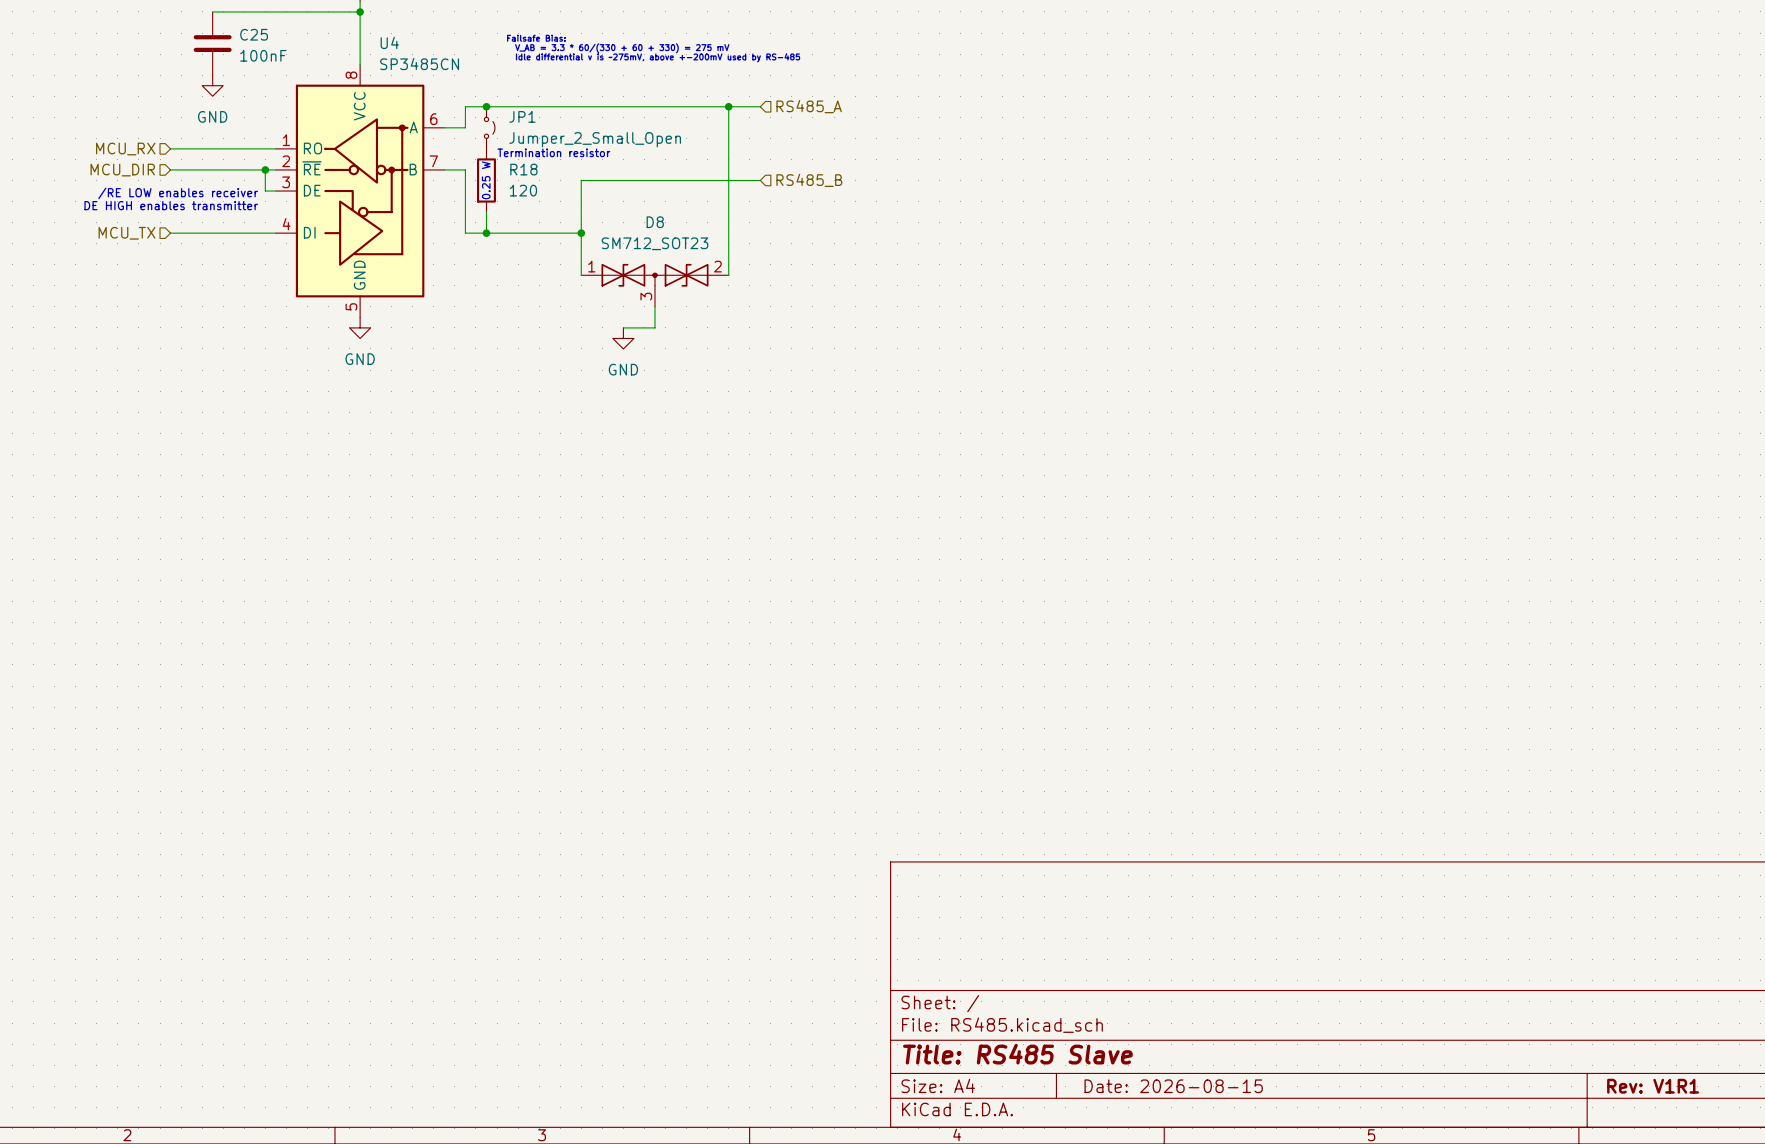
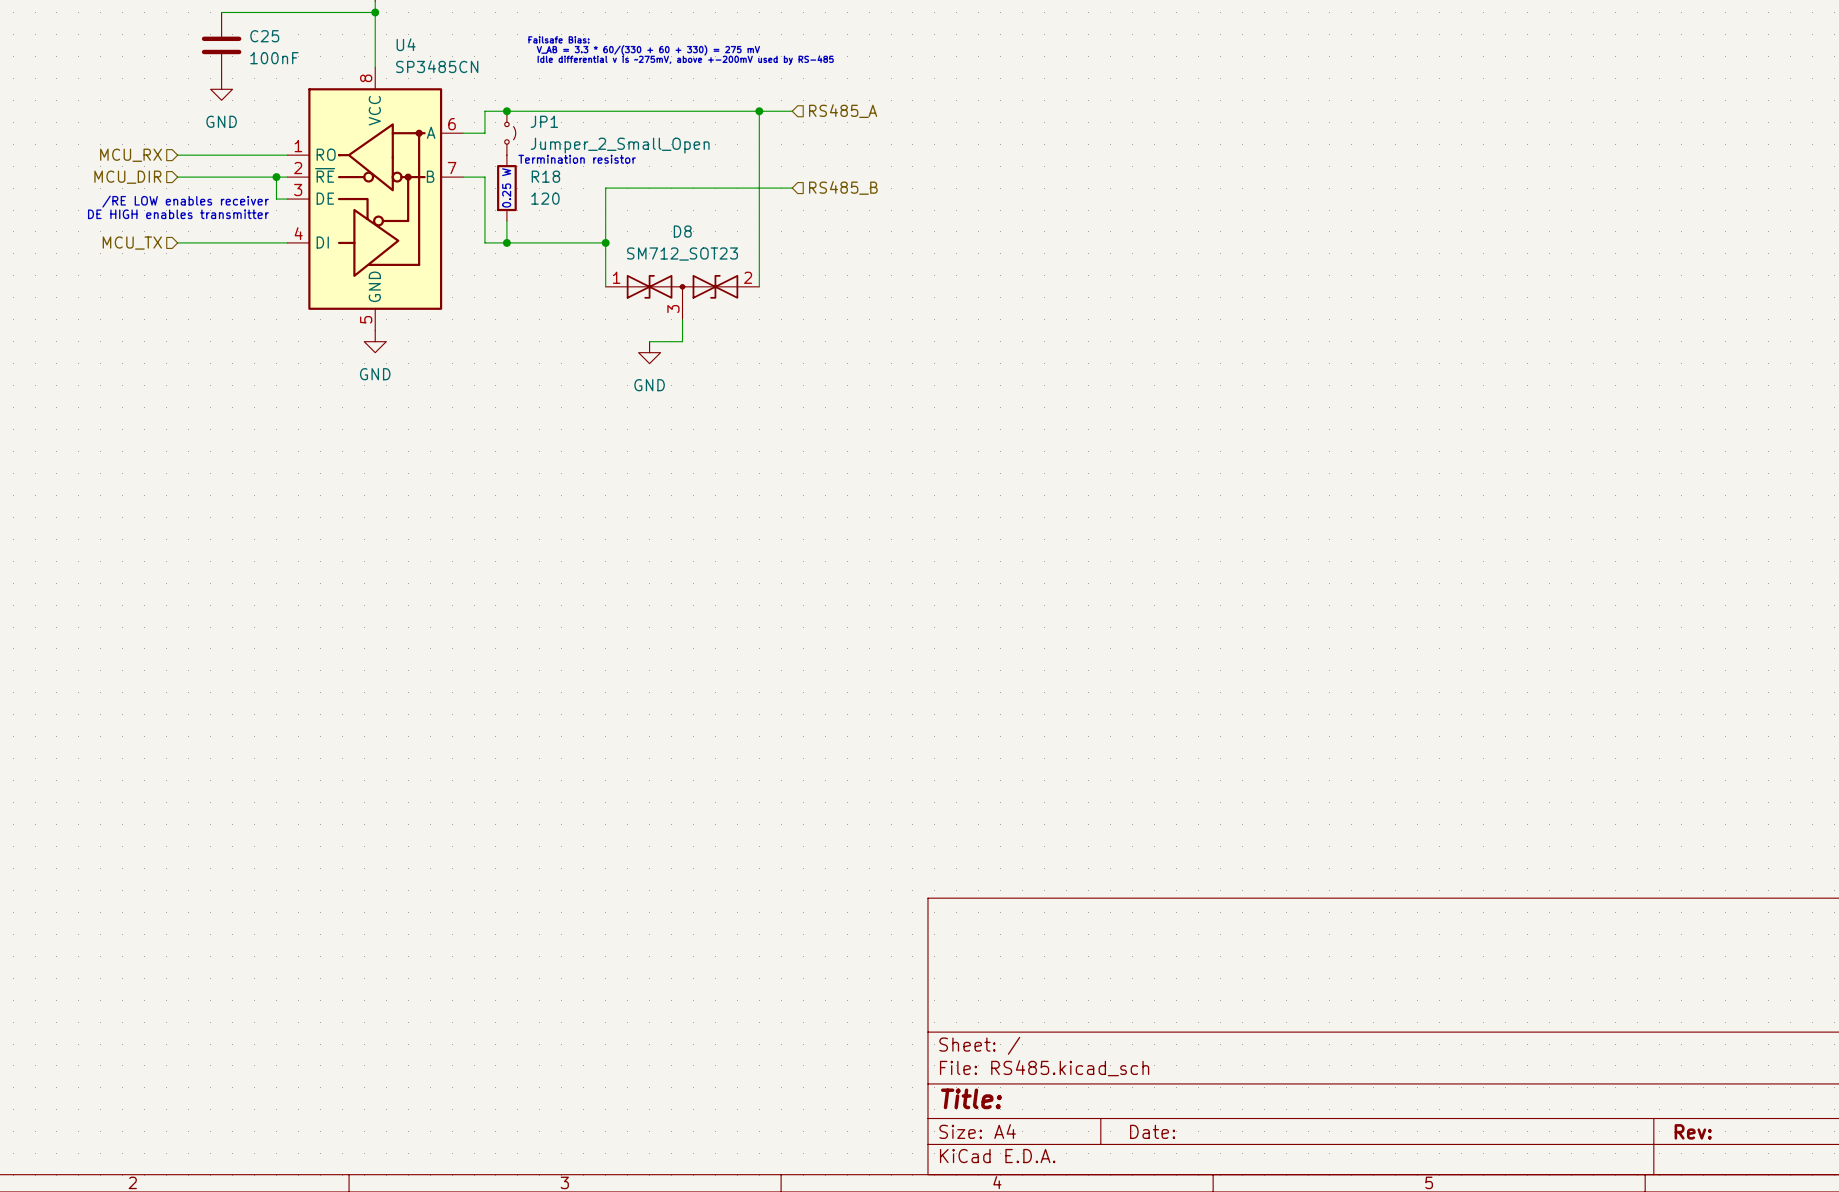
title block: Title: RS485 Slave (1017, 1054) -> Title: (971, 1098)
title block: Date: 2026-08-15 (1173, 1086) -> Date: (1152, 1131)
title block: Rev: V1R1 (1653, 1086) -> Rev: (1693, 1131)

